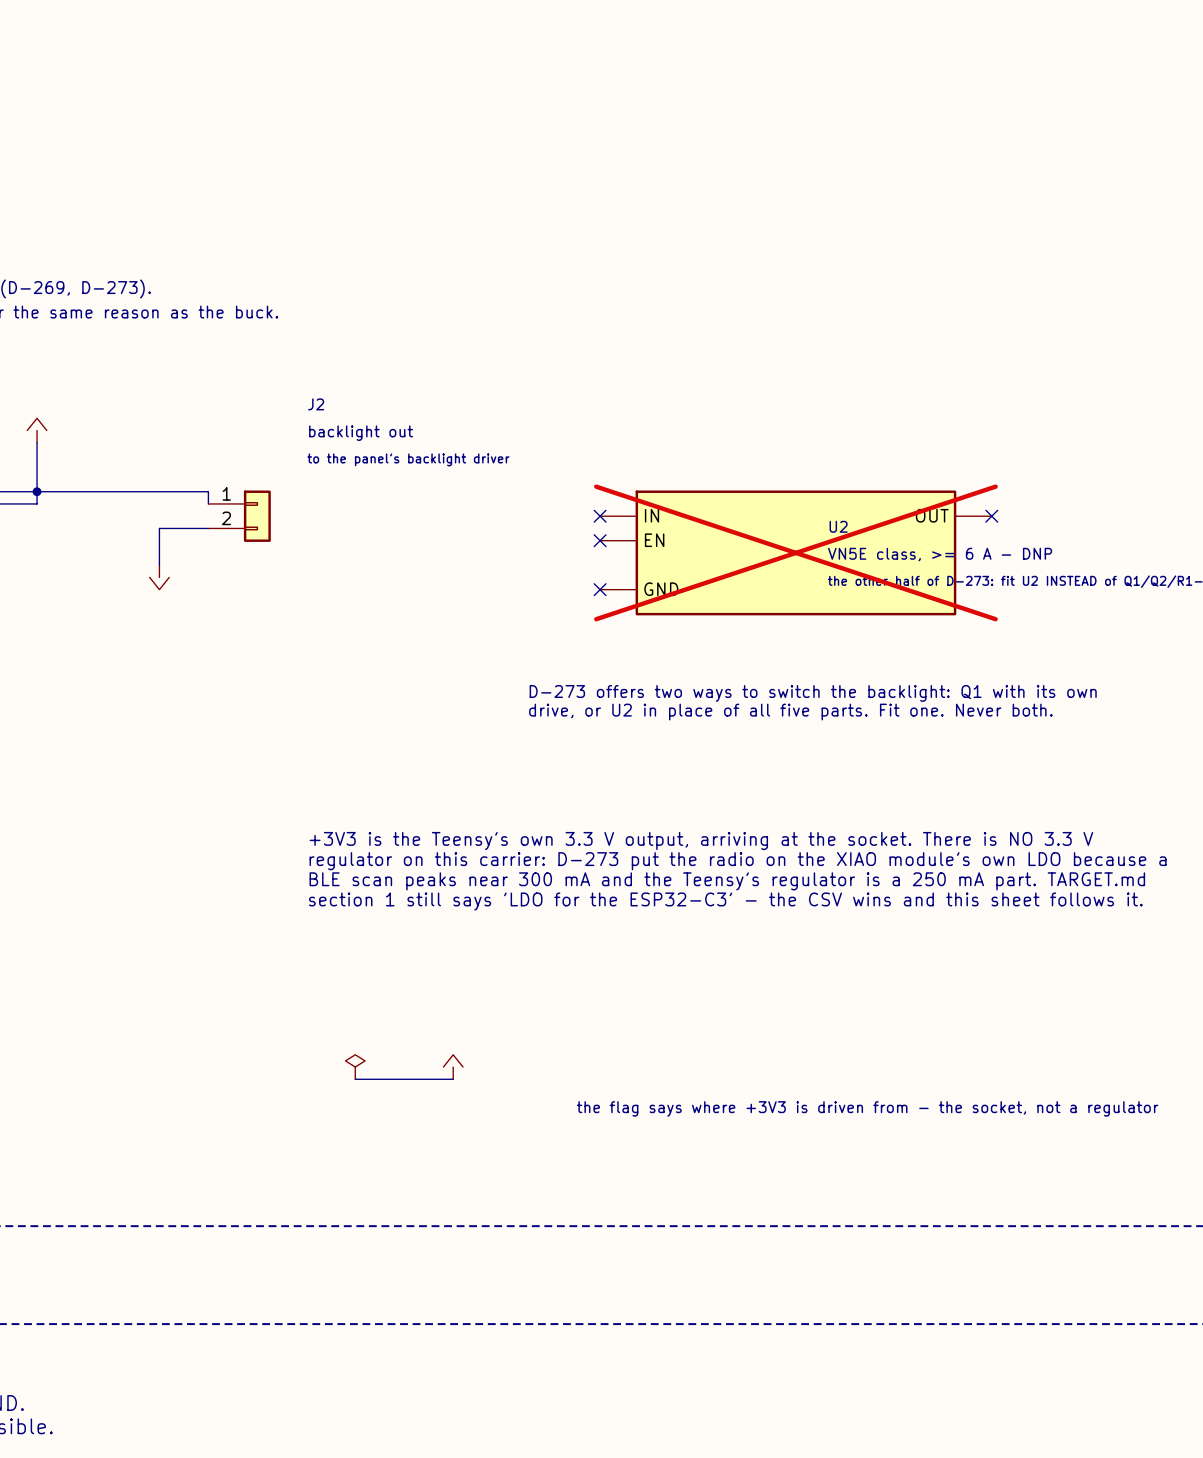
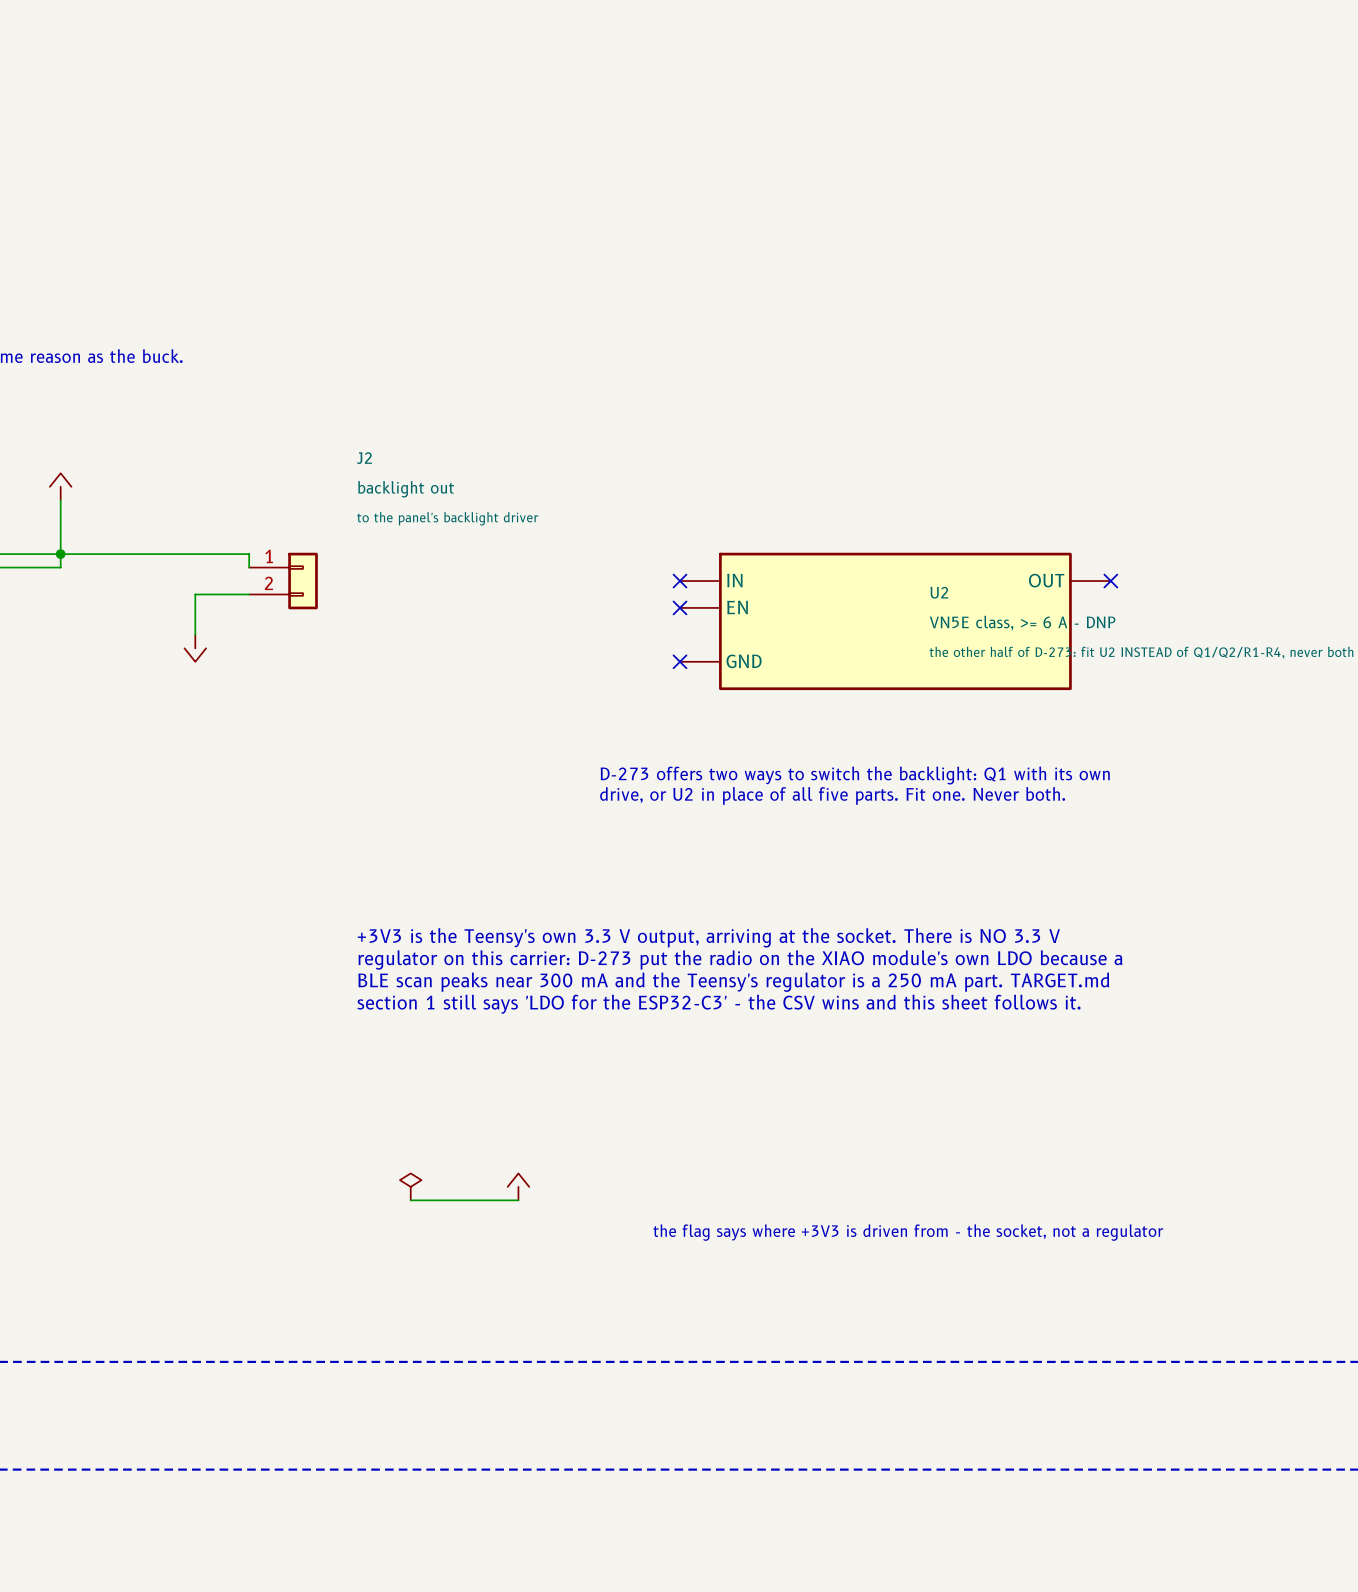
U2 do-not-place cross: (795, 552) -> none

